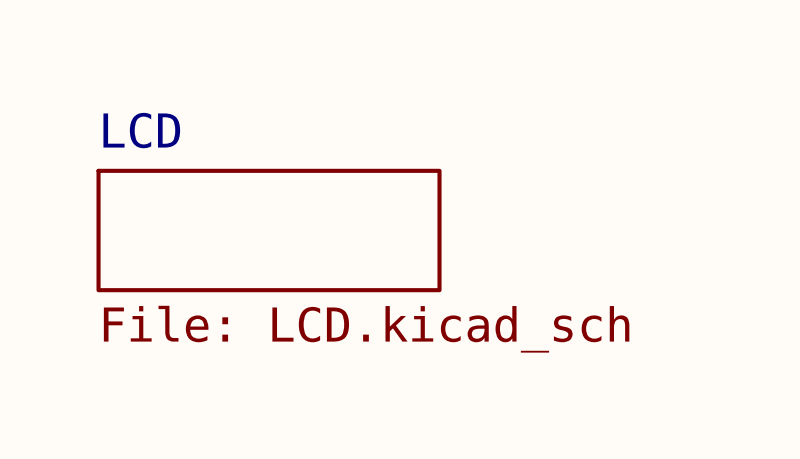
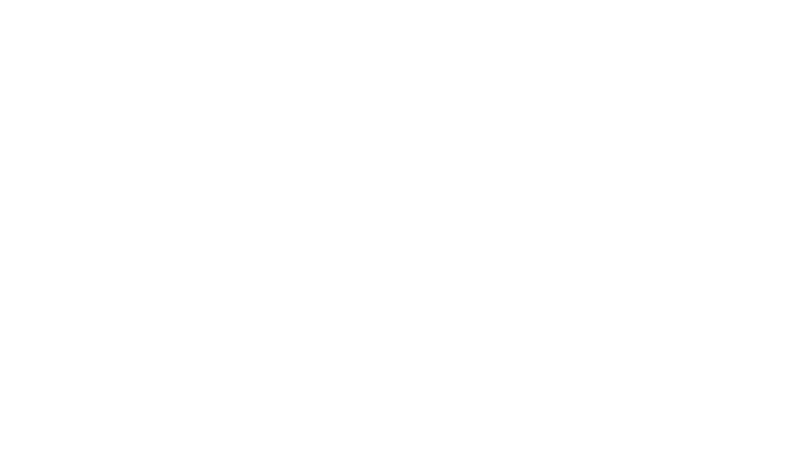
sheet LCD: File: LCD.kicad_sch (269, 230) -> none

